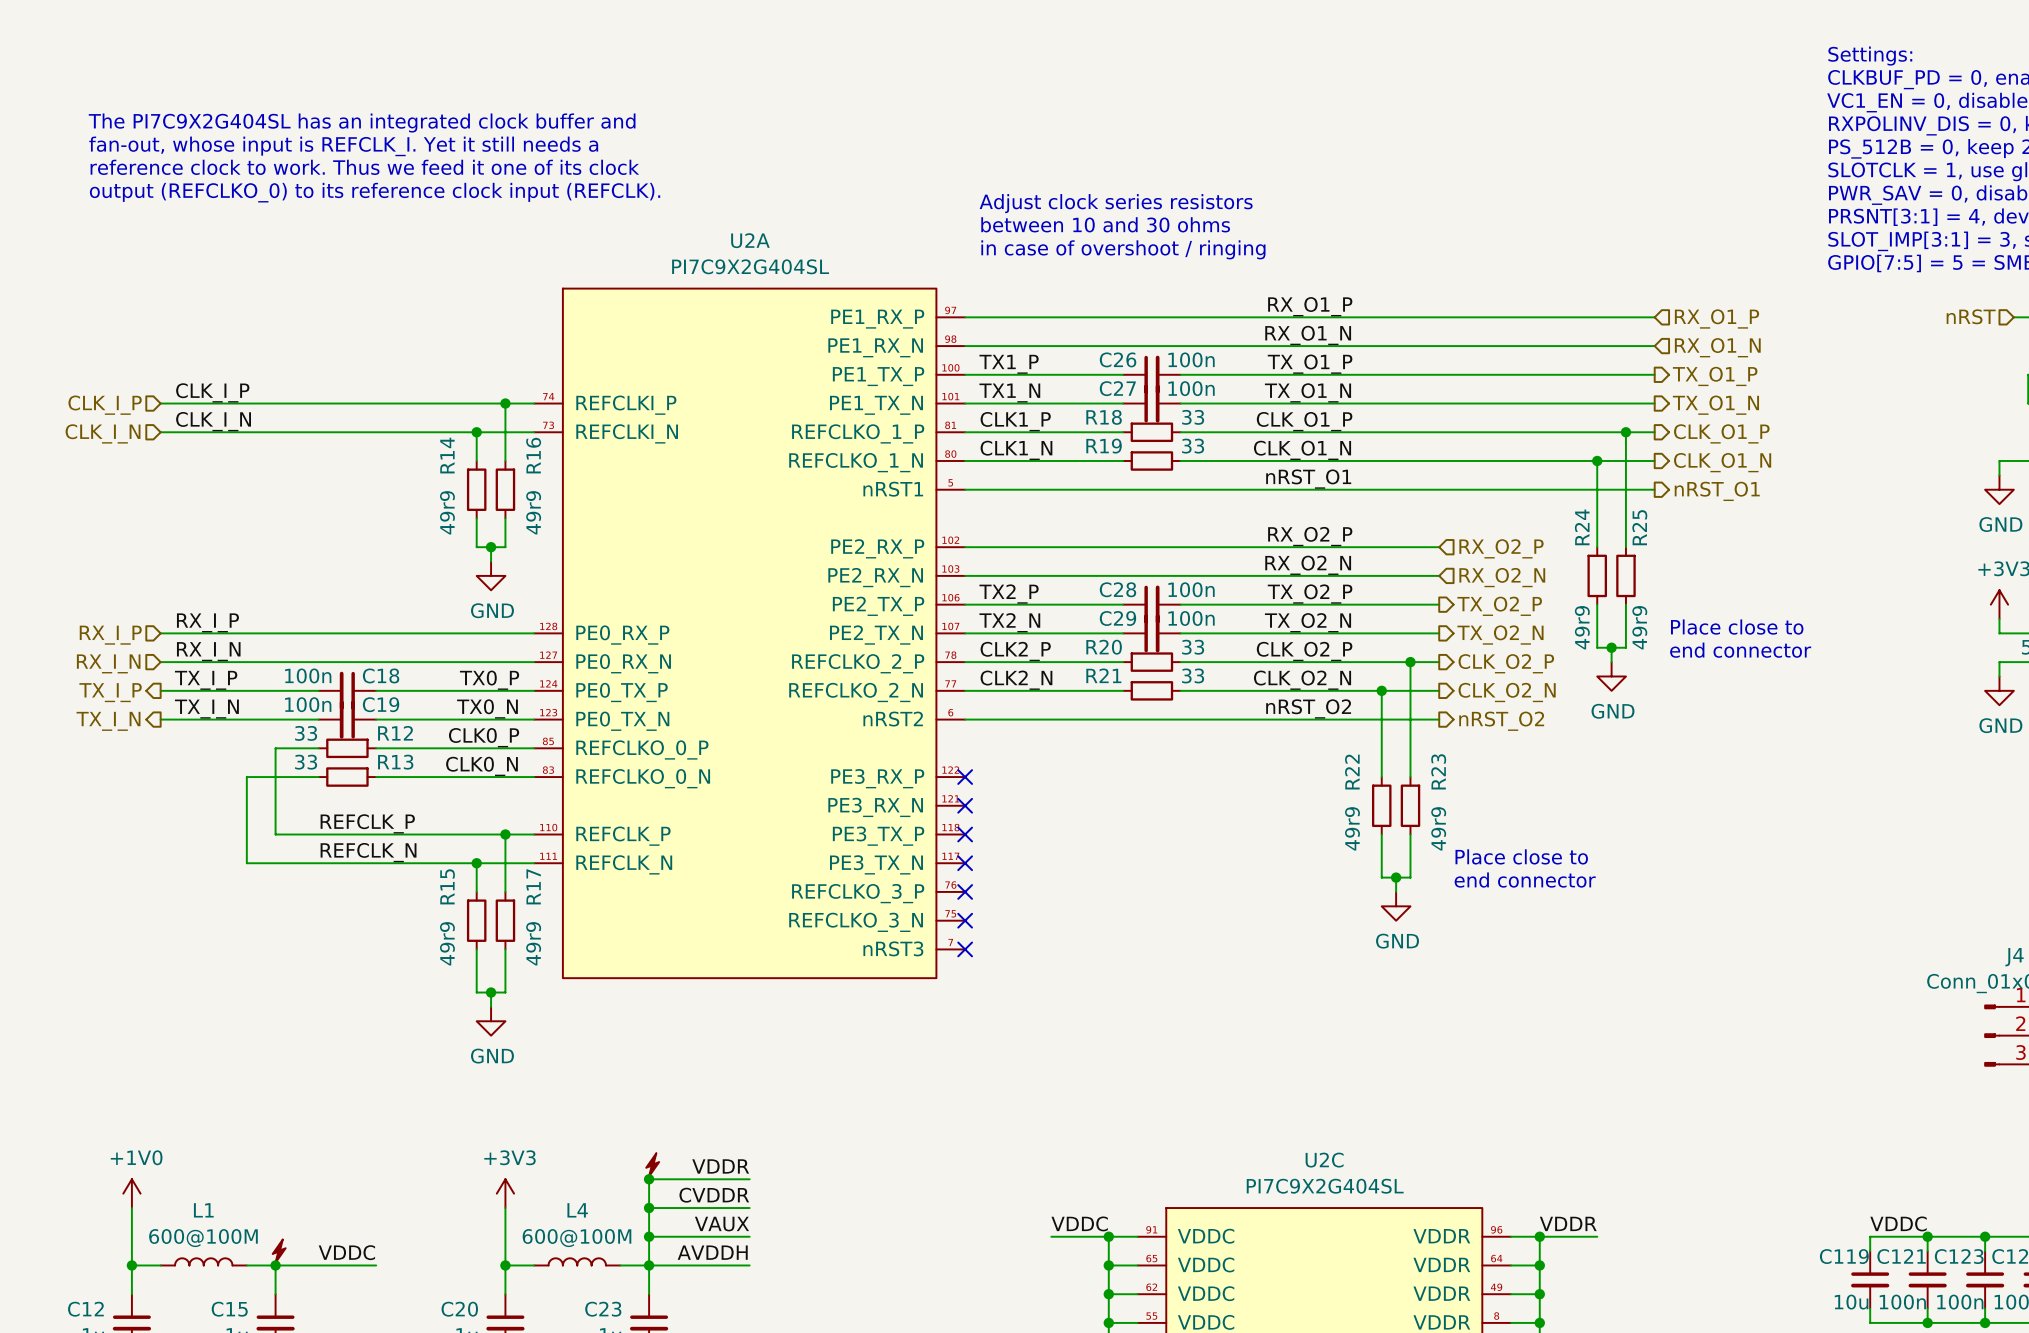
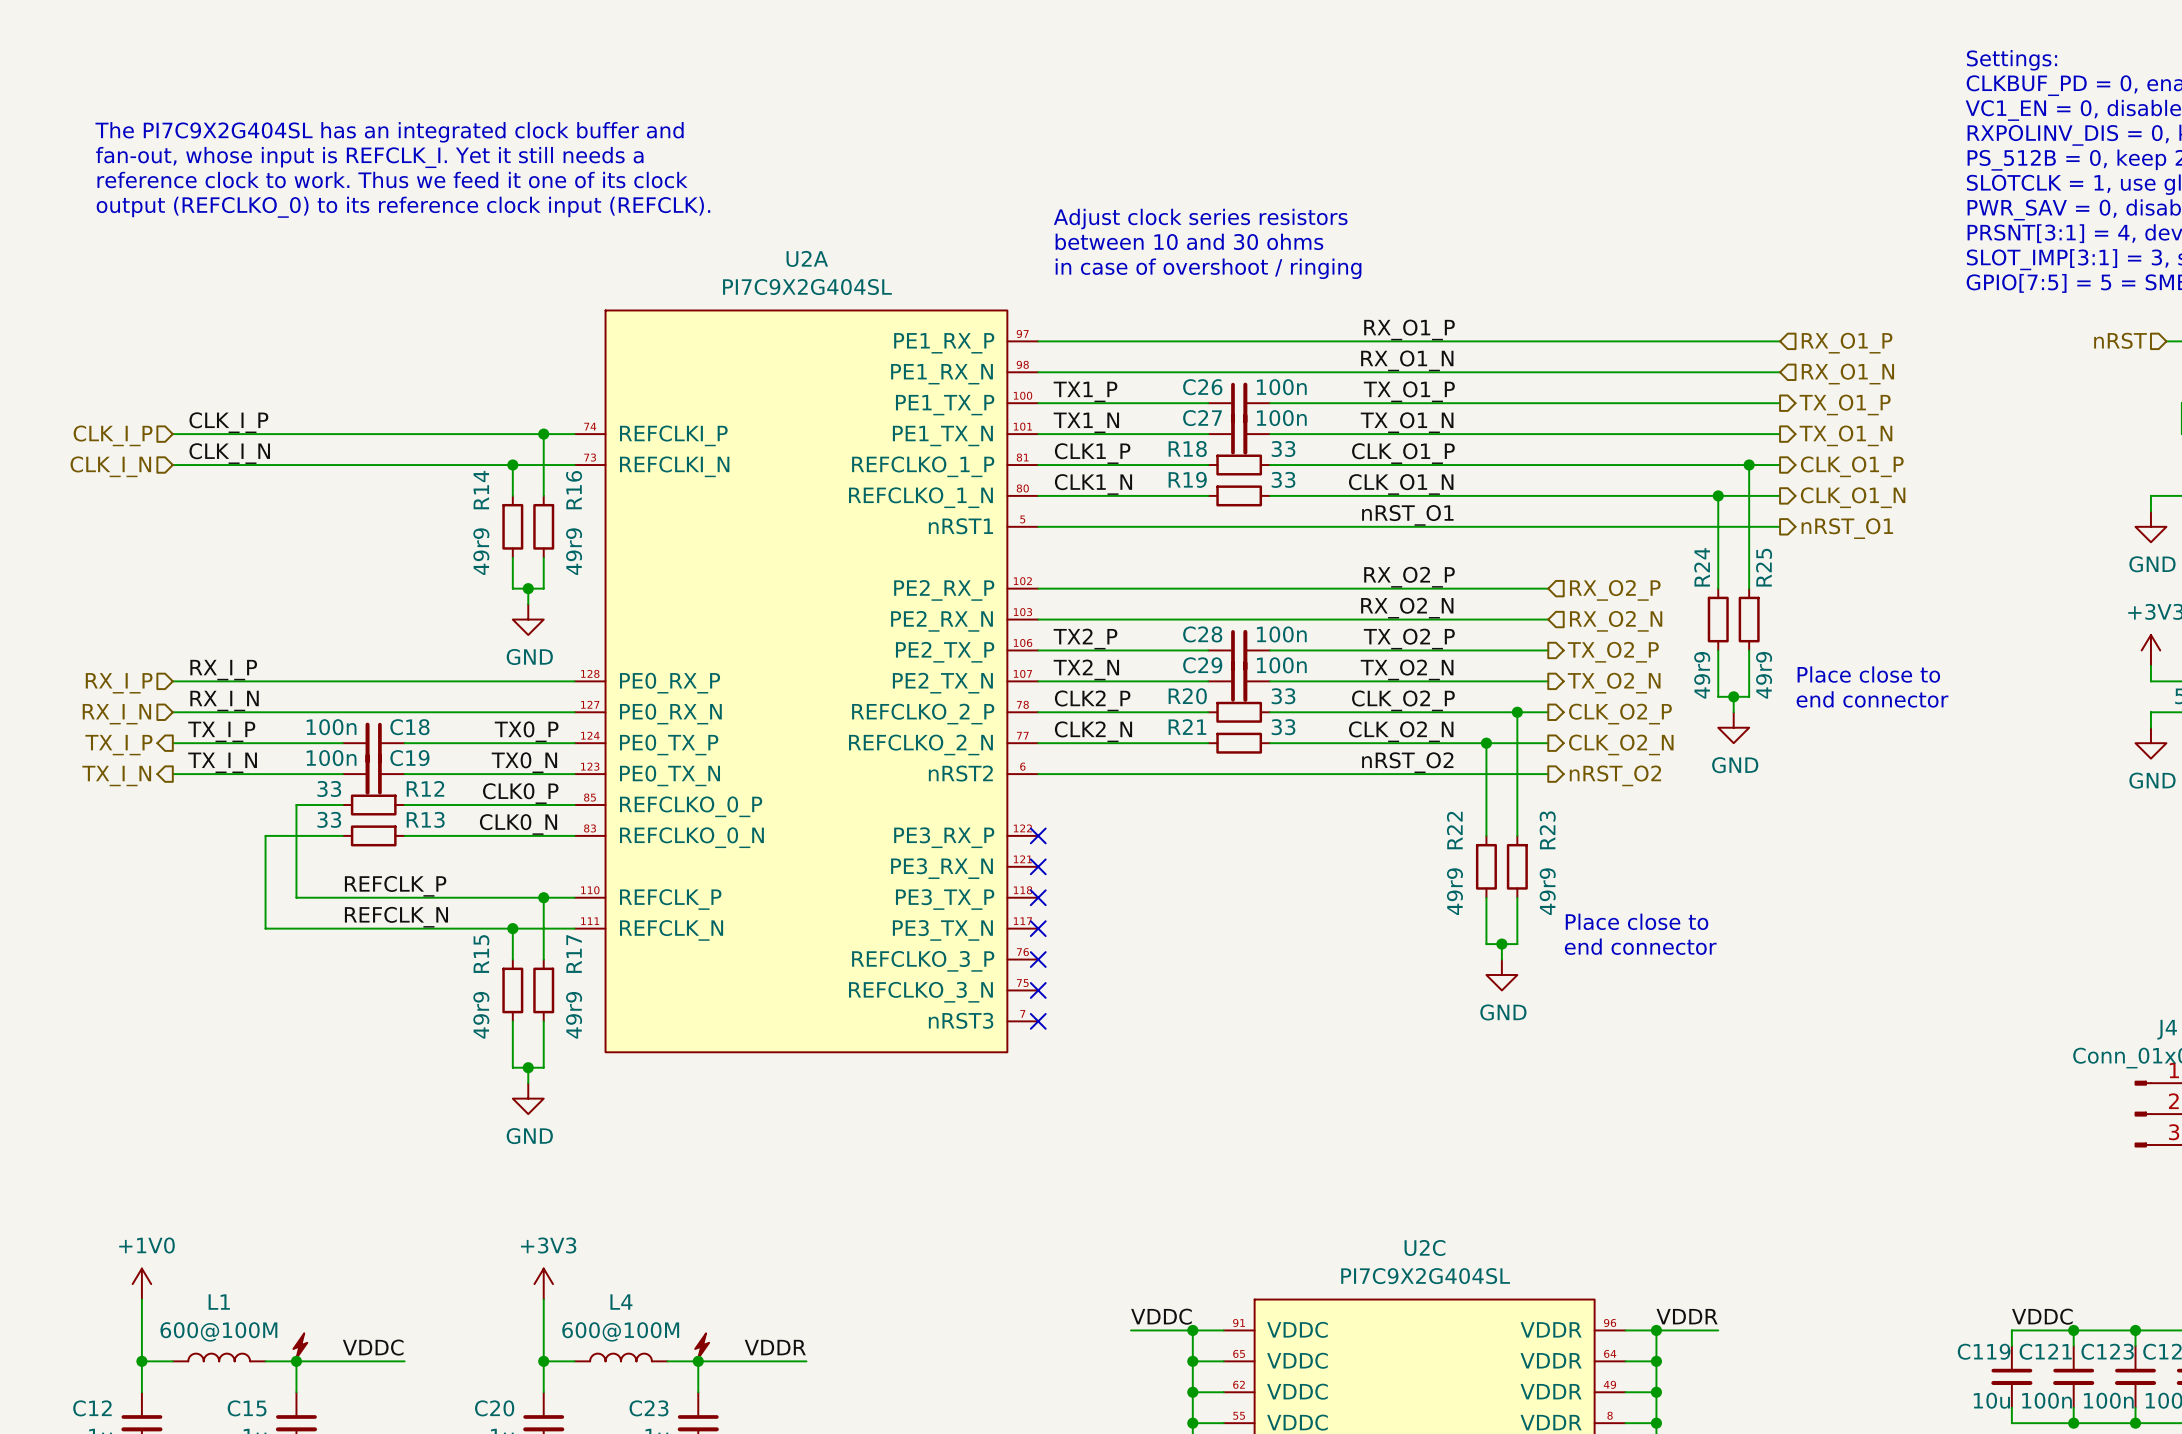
power symbol position: (652, 1164) -> (702, 1345)
label: VDDR (720, 1166) -> none
junction: (649, 1179) -> none
wire: (749, 1179) (649, 1179) (649, 1265) -> none
label: CVDDR (714, 1195) -> none
wire: (649, 1208) (749, 1208) -> none
junction: (649, 1208) -> none
label: VAUX (721, 1224) -> none
wire: (649, 1236) (749, 1236) -> none
junction: (649, 1236) -> none
label: AVDDH (712, 1252) -> VDDR (775, 1347)

